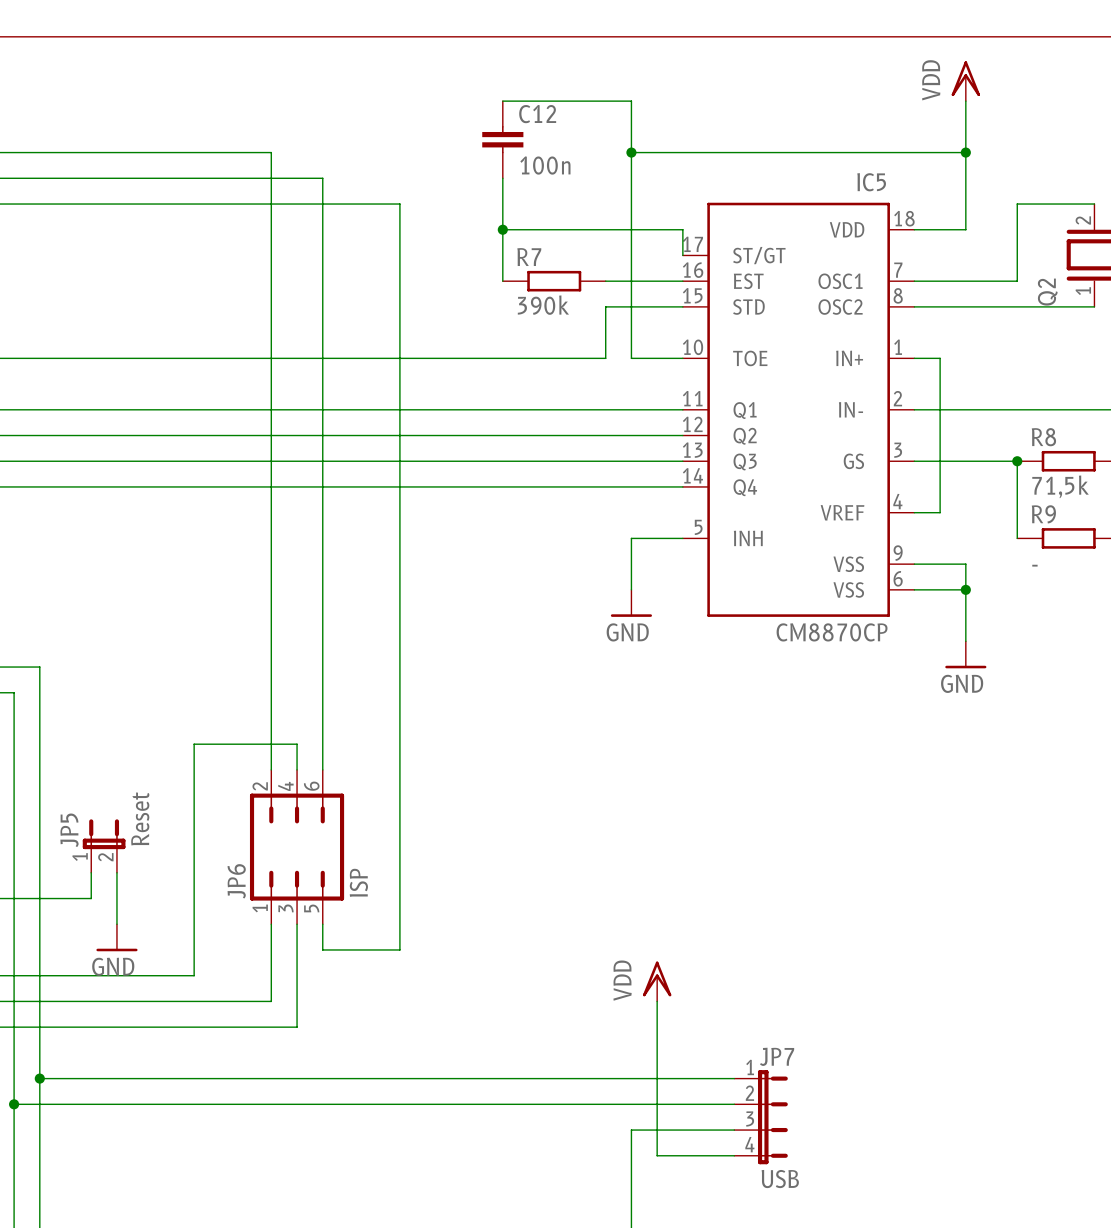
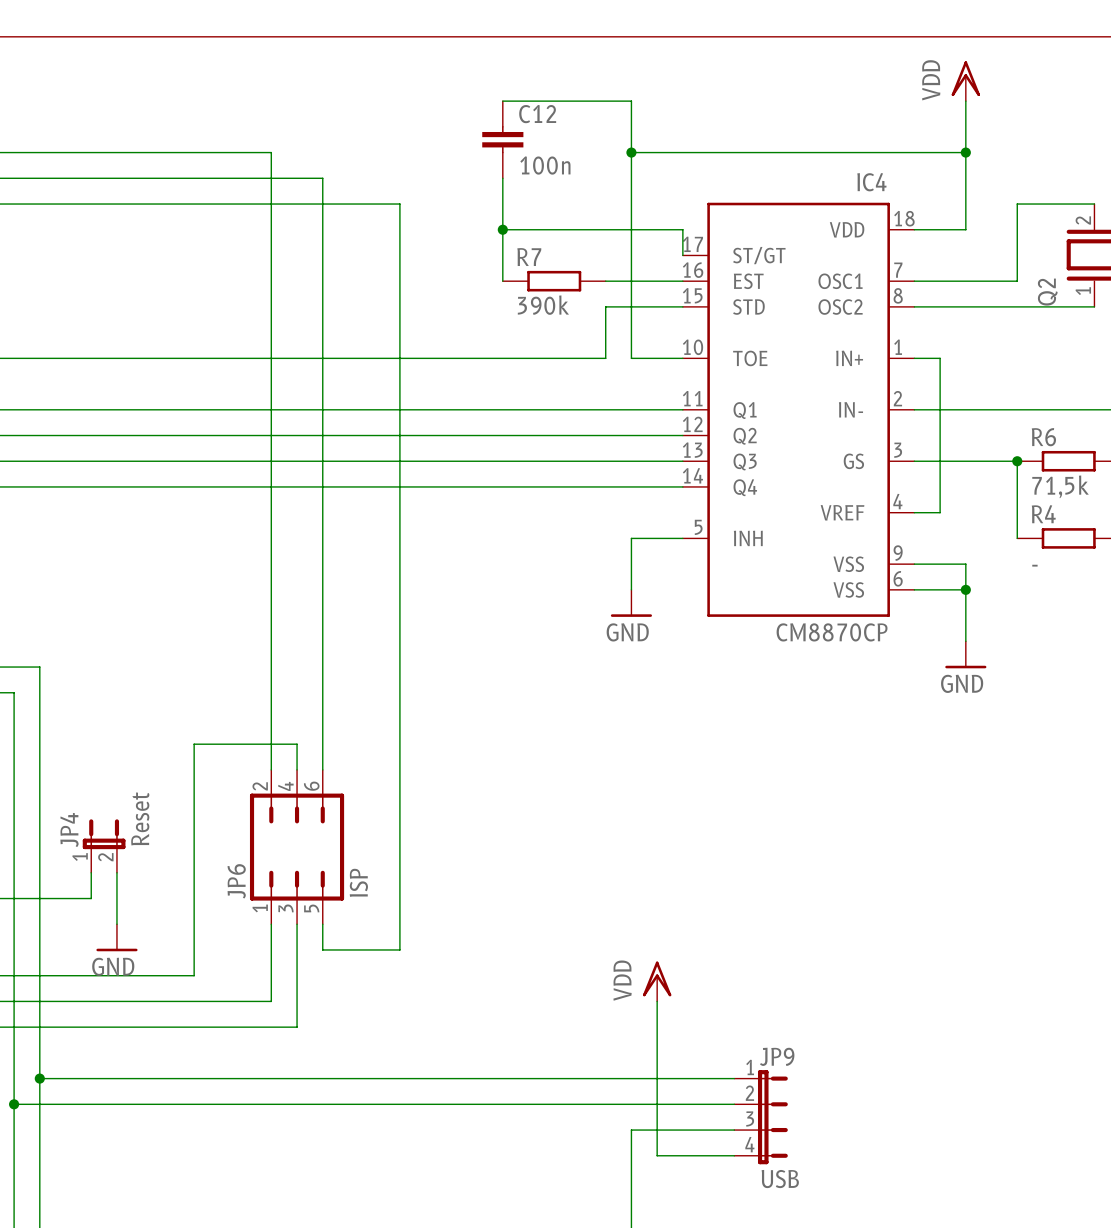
IC5 name: IC5 (871, 182) -> IC4 (871, 182)
R8 name: R8 (1043, 437) -> R6 (1043, 437)
R9 name: R9 (1043, 514) -> R4 (1043, 514)
JP5 name: JP5 (69, 830) -> JP4 (69, 830)
JP7 name: JP7 (777, 1056) -> JP9 (777, 1056)

